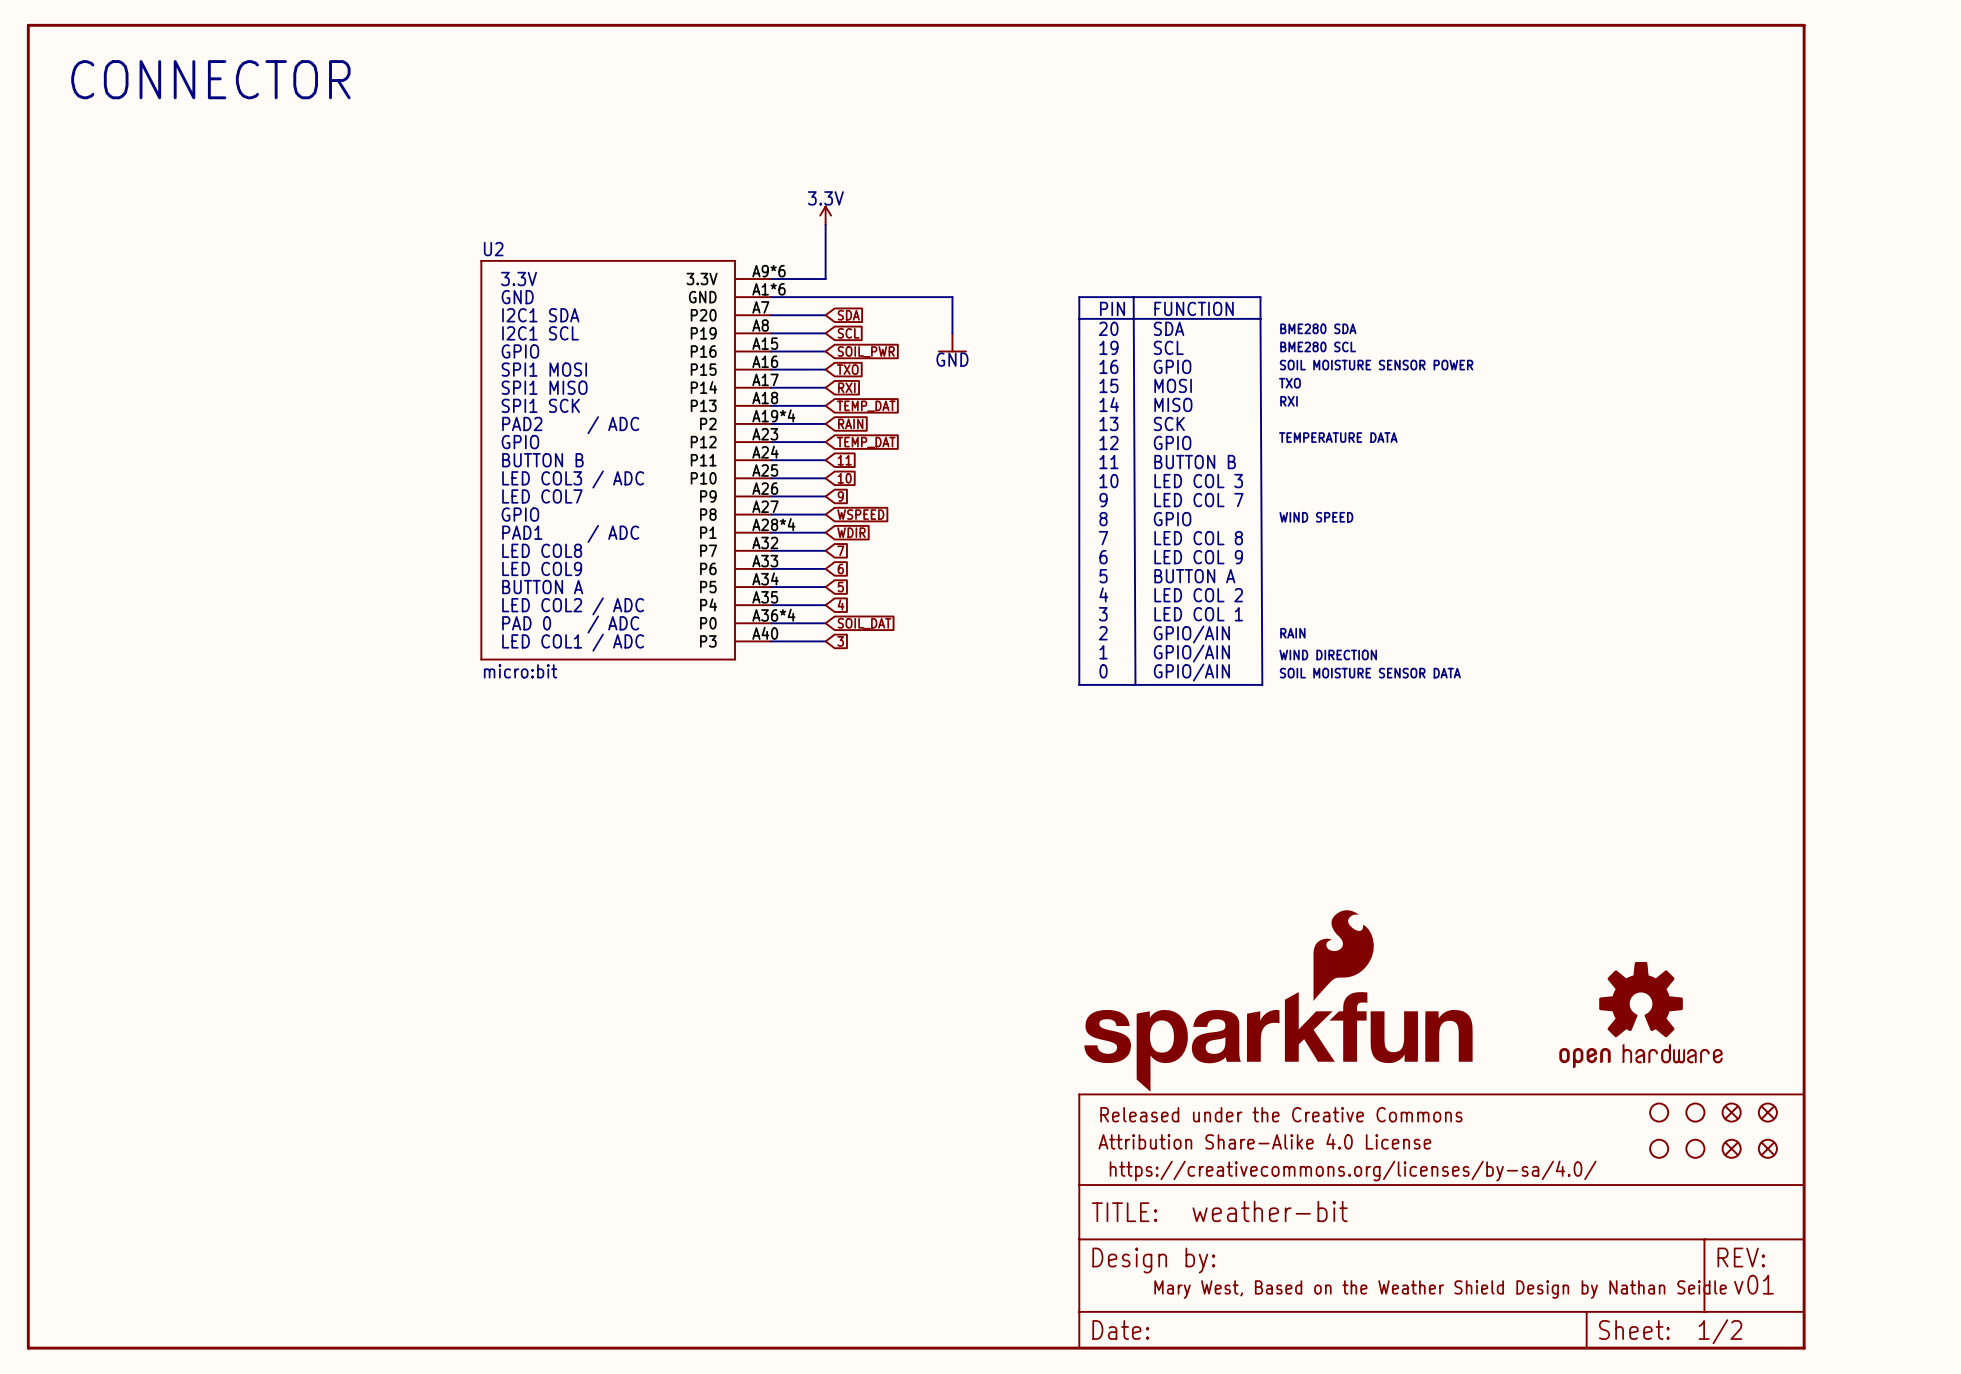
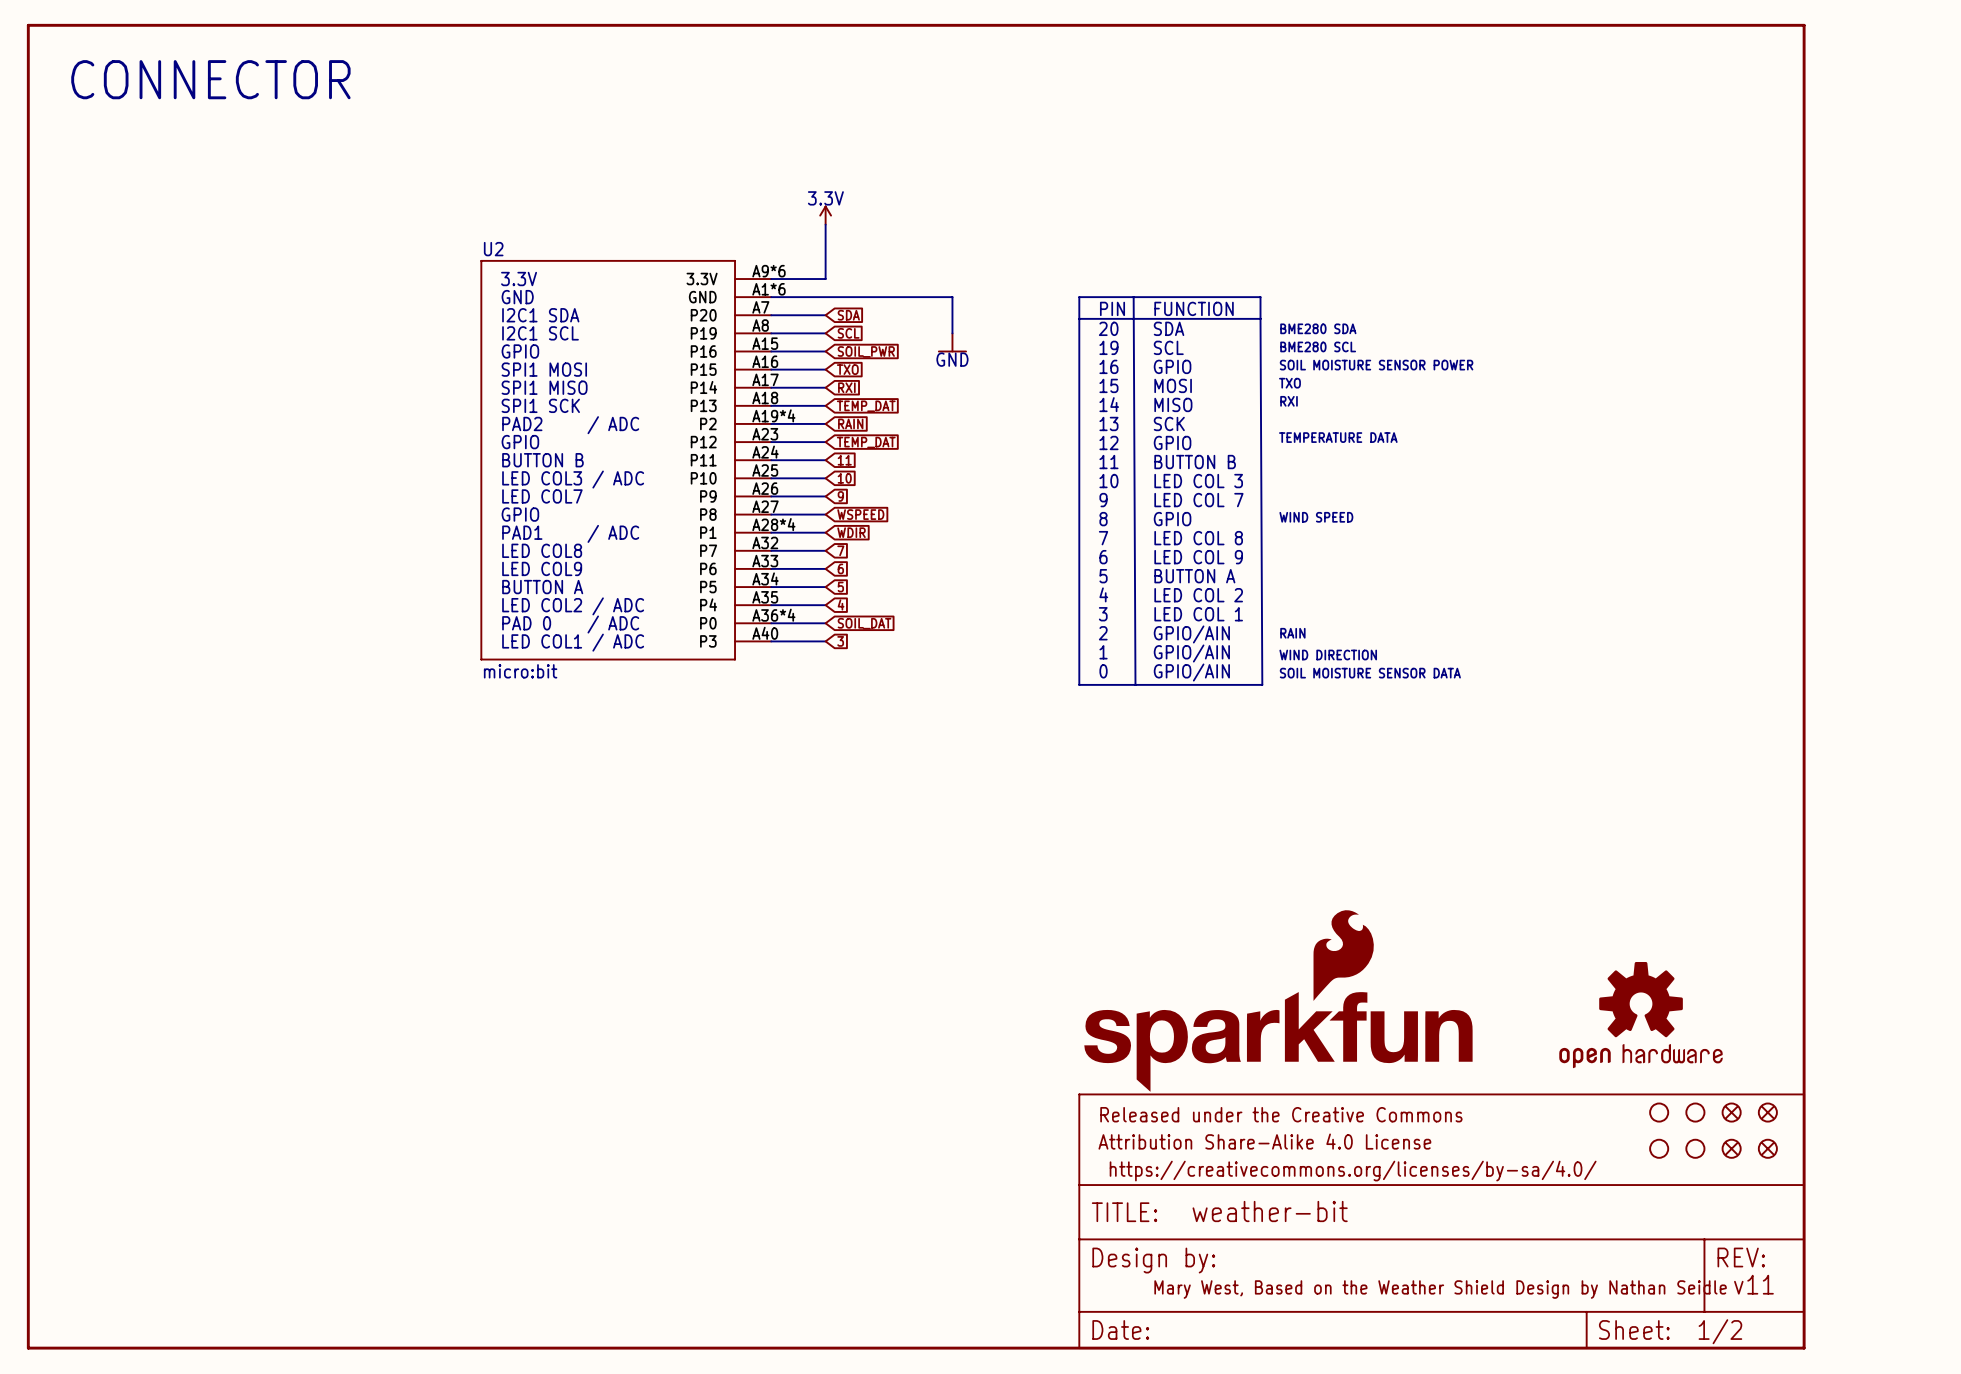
text: v01 (1753, 1284) -> v11 (1753, 1284)

